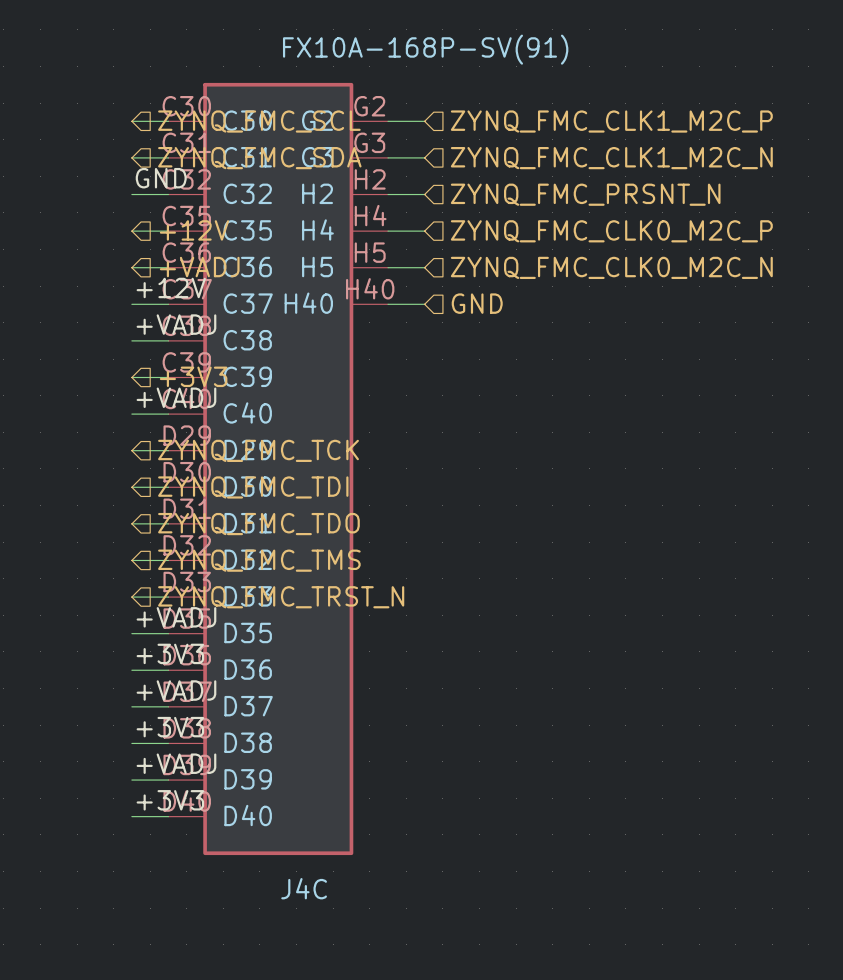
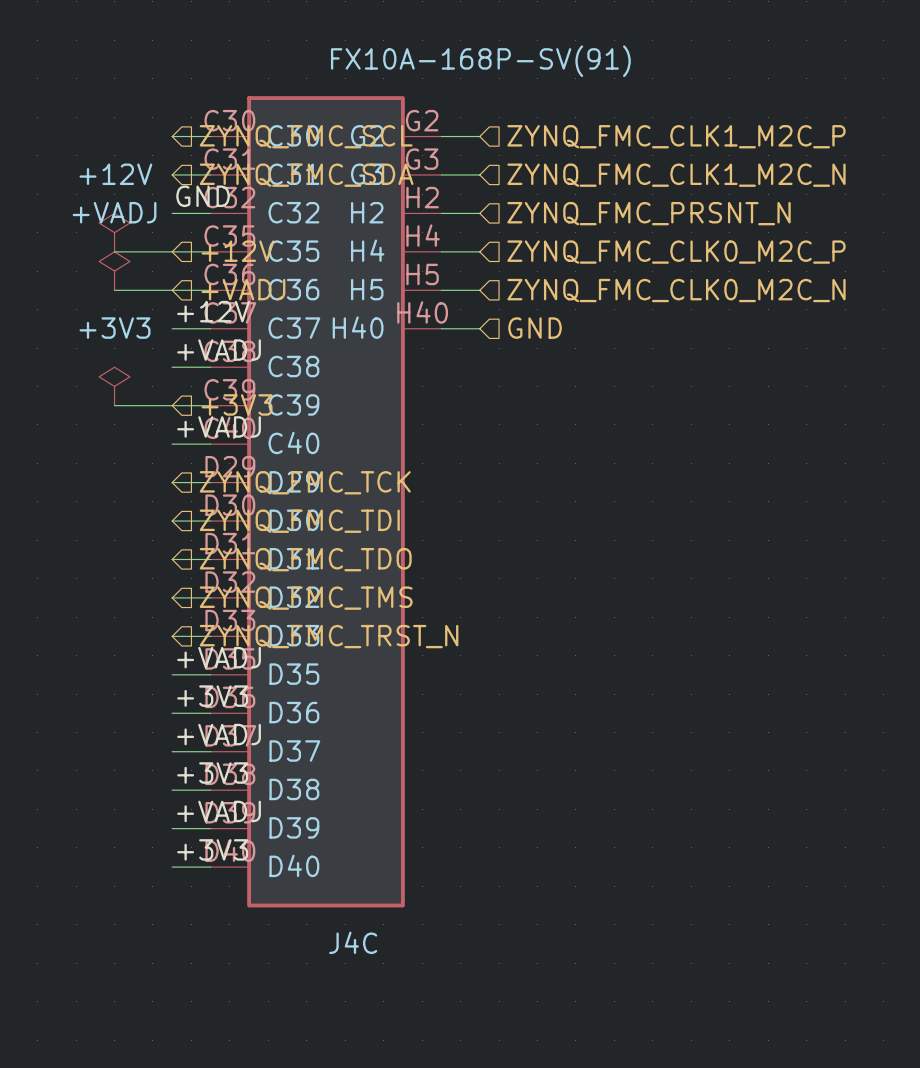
power symbol: none -> +12V (114, 232)
wire: none -> (114, 251) (172, 251)
power symbol: none -> +VADJ (114, 271)
wire: none -> (114, 290) (172, 290)
power symbol: none -> +3V3 (114, 386)
wire: none -> (114, 405) (172, 405)

